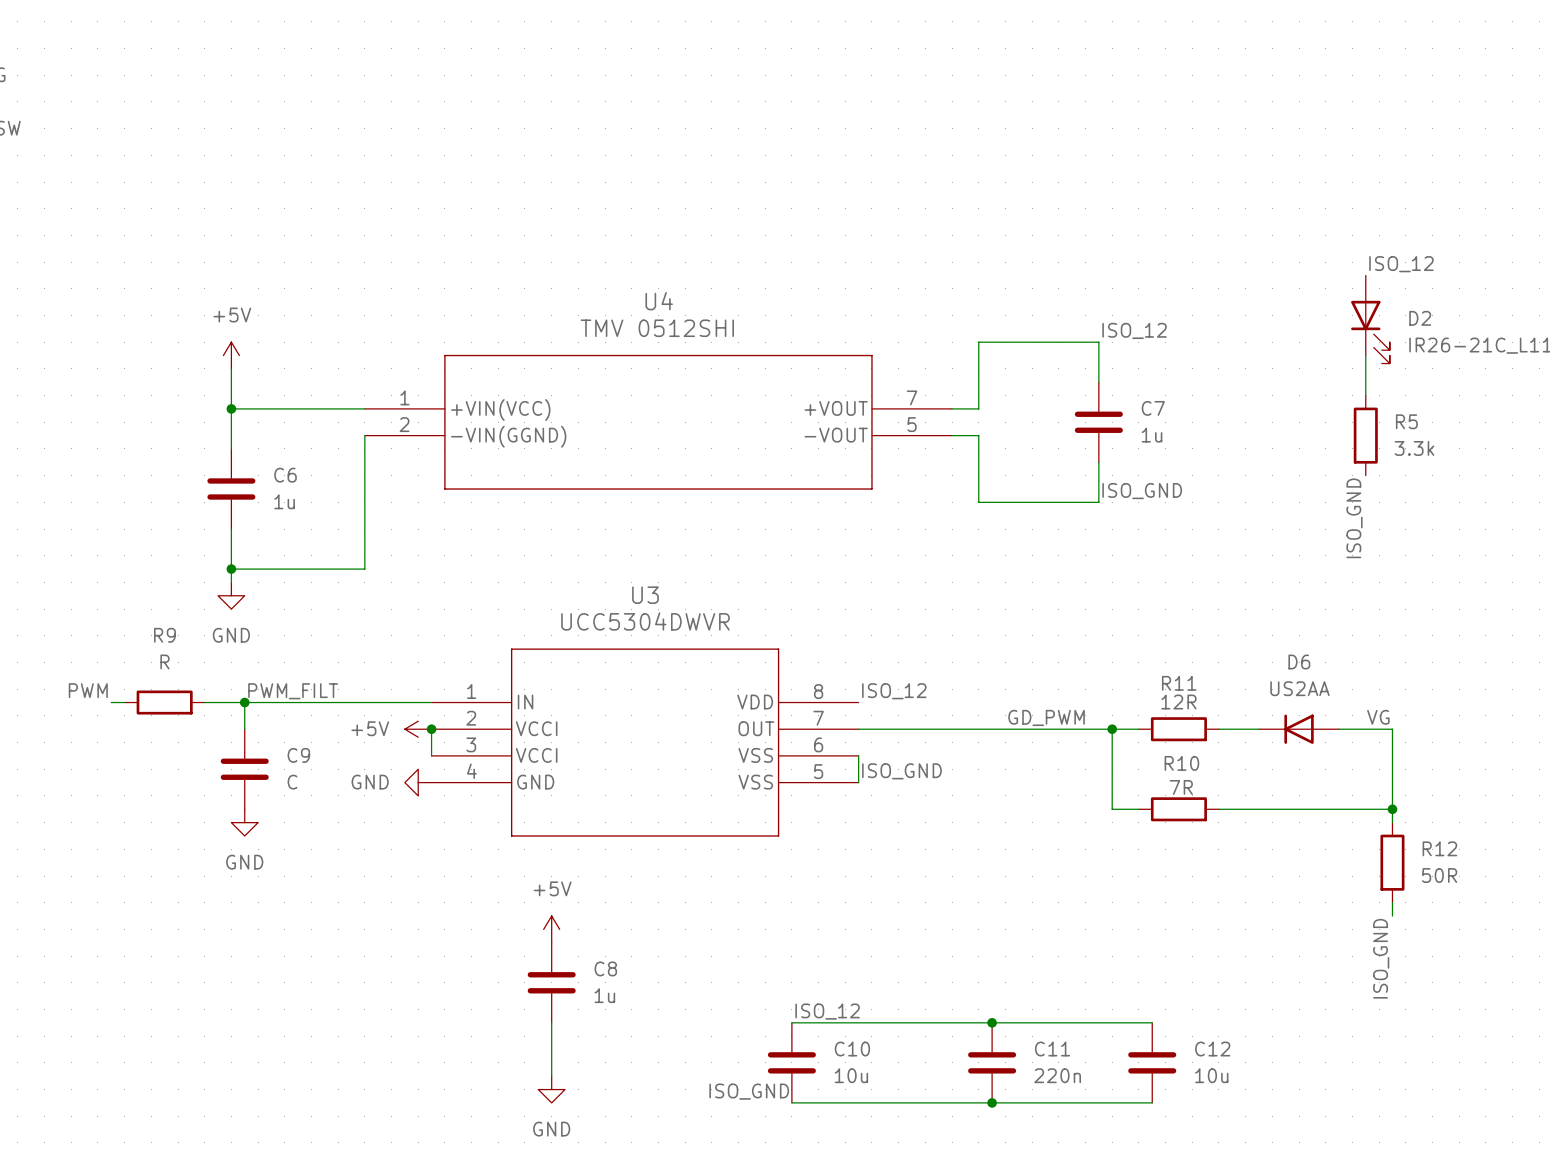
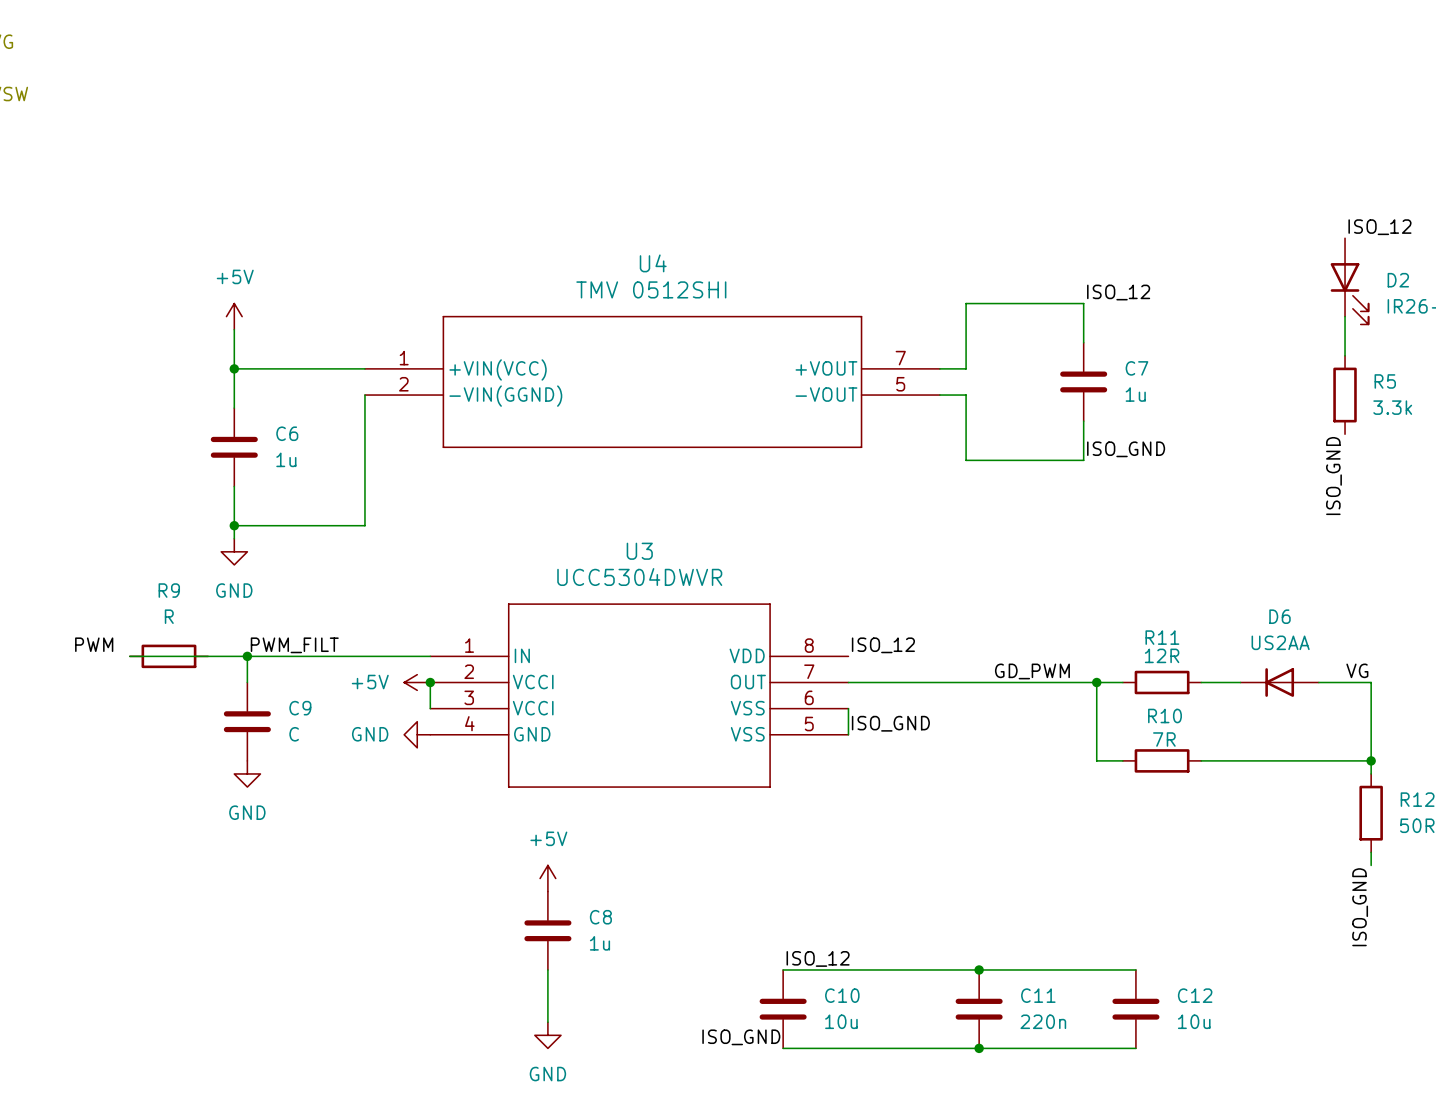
wire: (111, 702) (124, 702) -> (208, 656) (129, 656)

